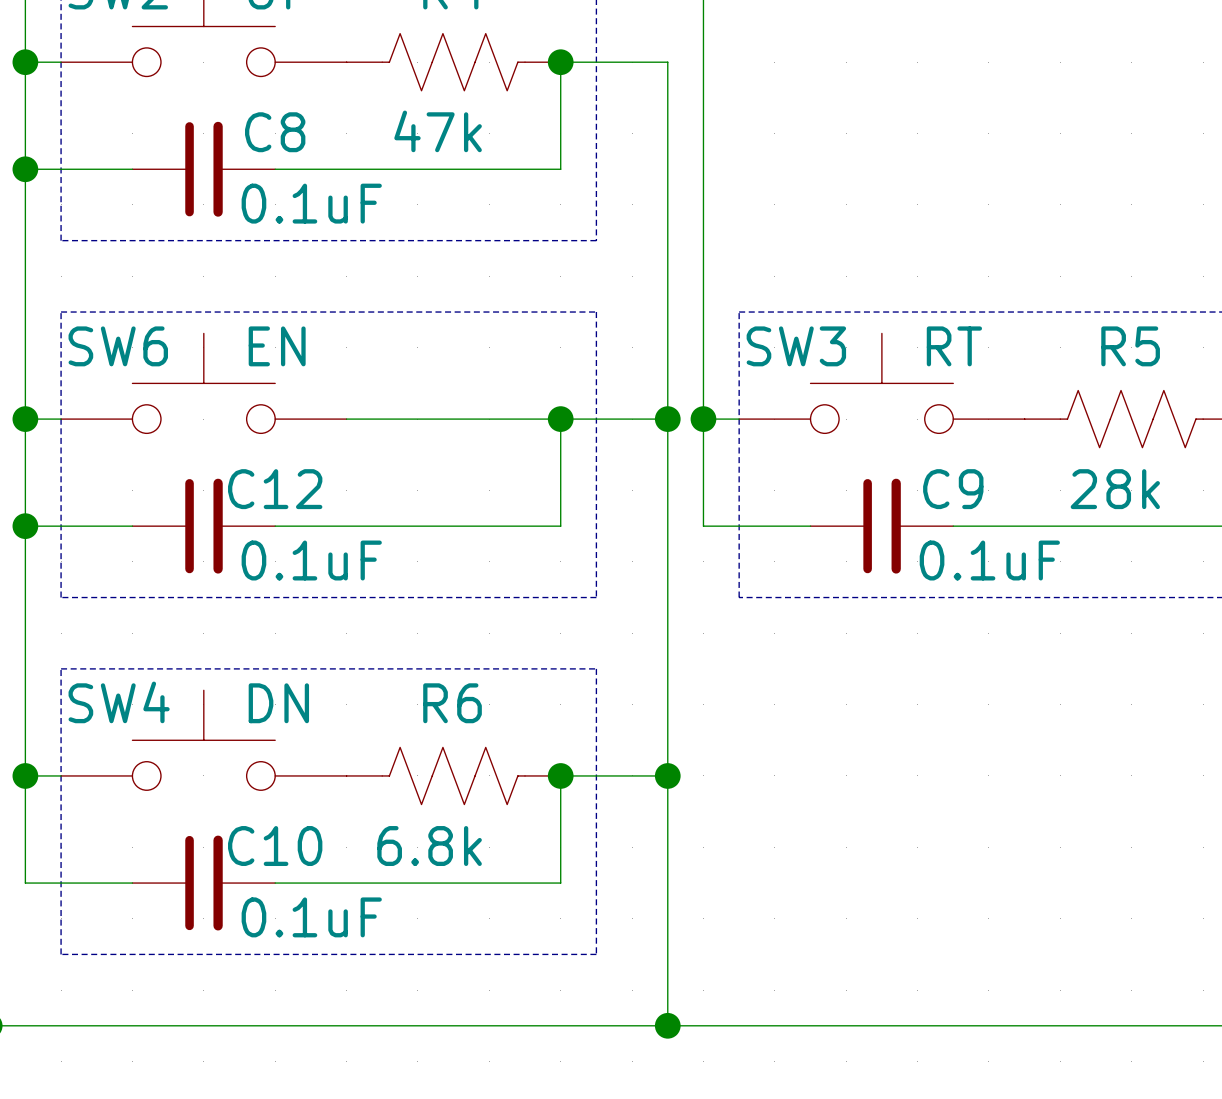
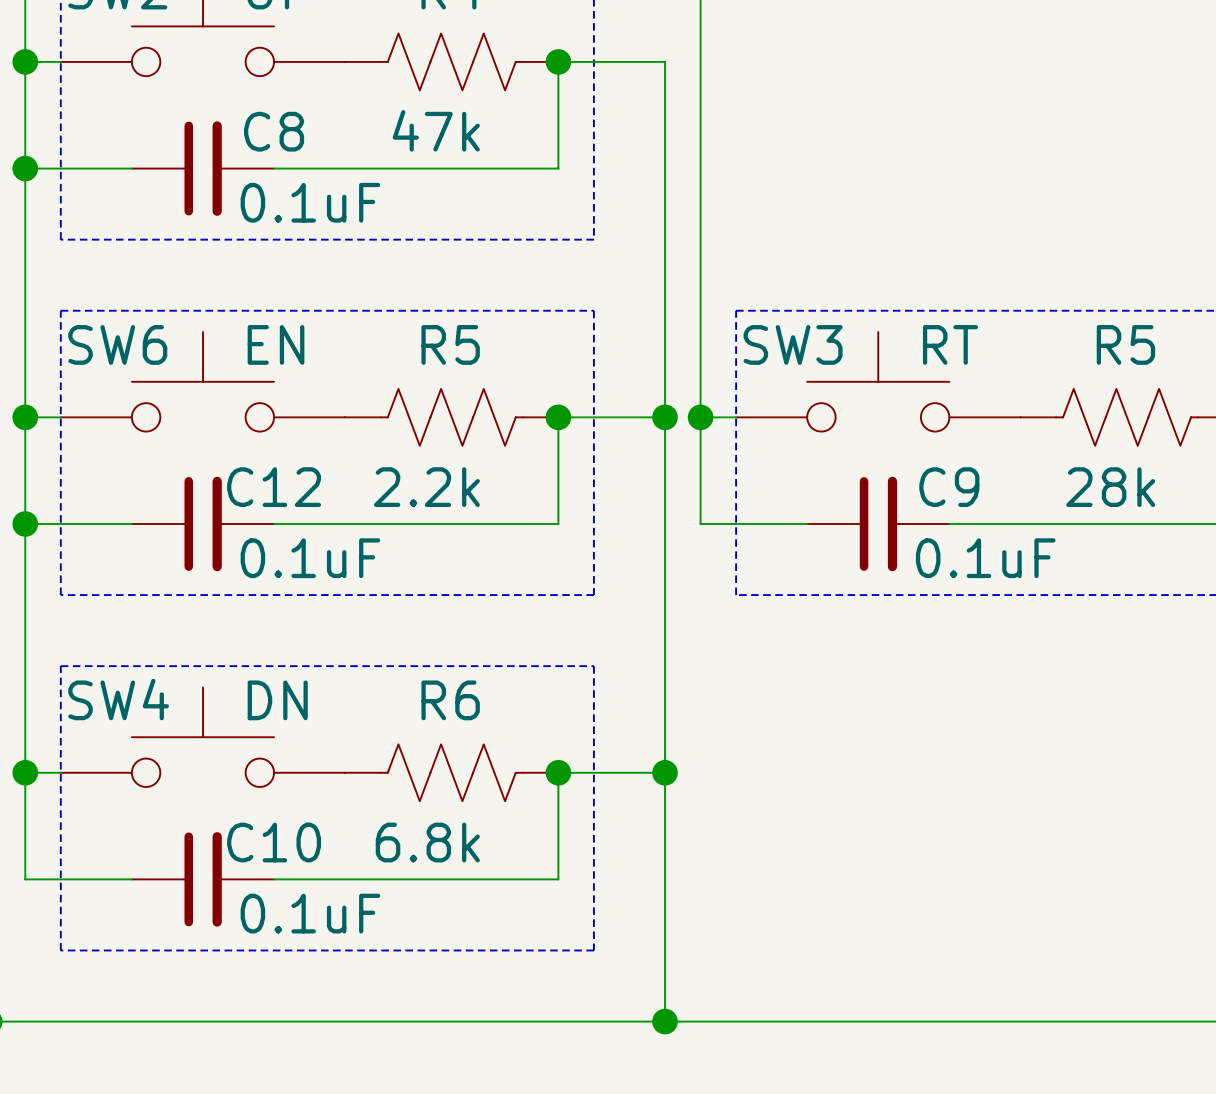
wire: (346, 419) (560, 419) -> none
R5: none -> 2.2k (451, 417)

